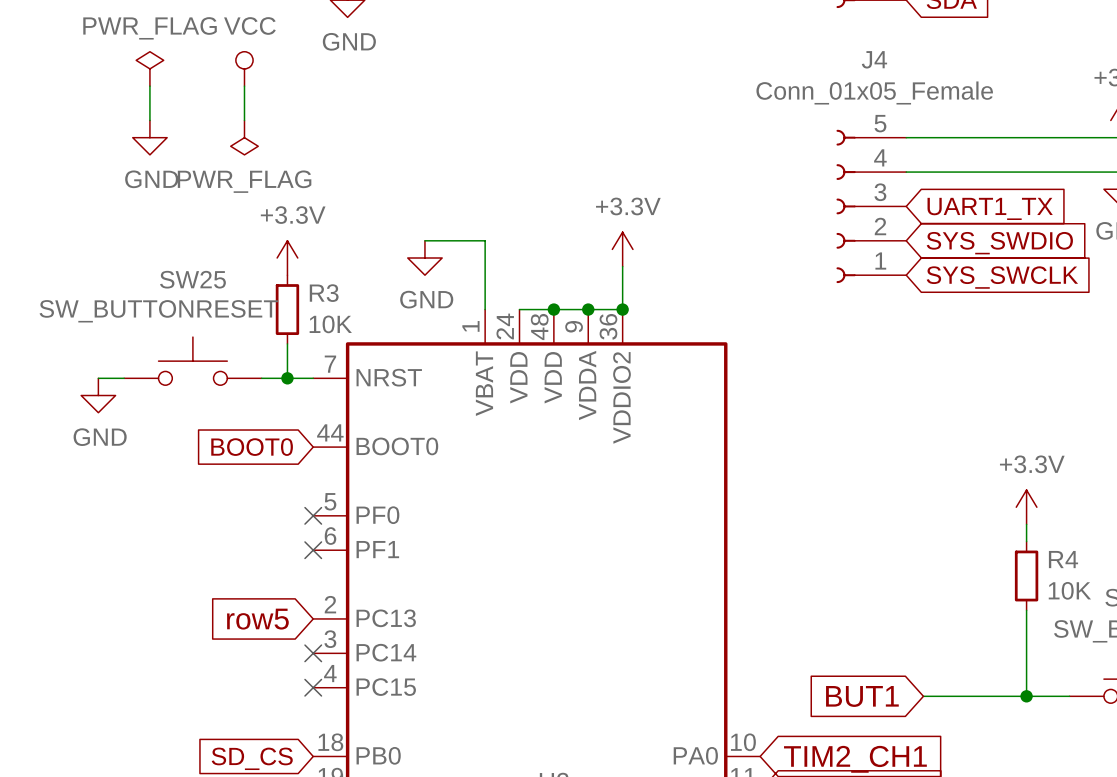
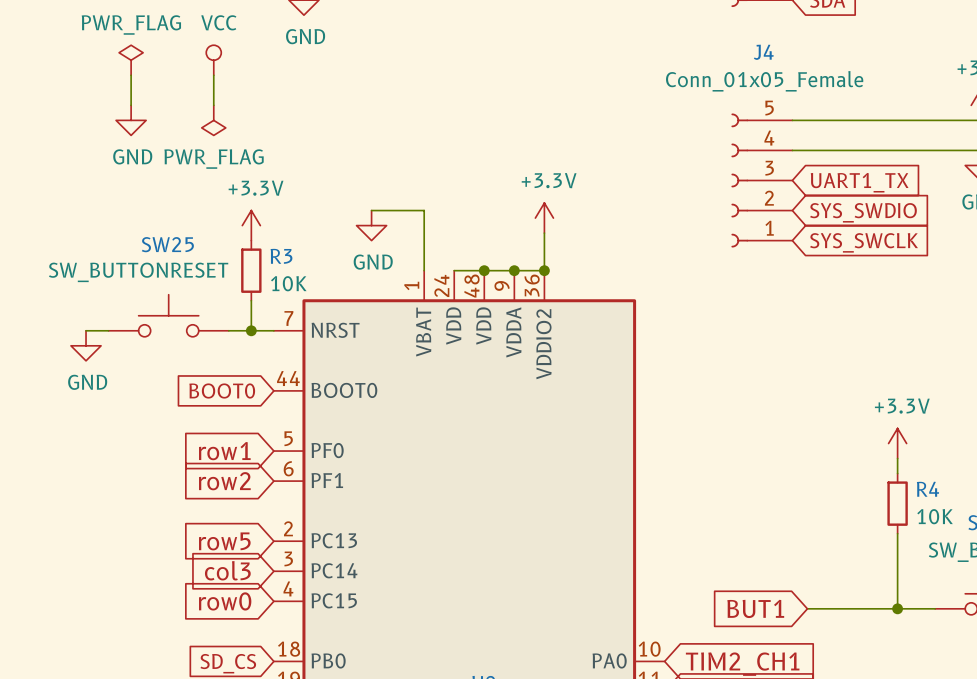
global label: none -> row1 (224, 451)
no-connect mark: (313, 515) -> none
global label: none -> row2 (224, 481)
no-connect mark: (313, 550) -> none
global label: none -> col3 (227, 570)
no-connect mark: (313, 653) -> none
global label: none -> row0 (225, 601)
no-connect mark: (313, 687) -> none

